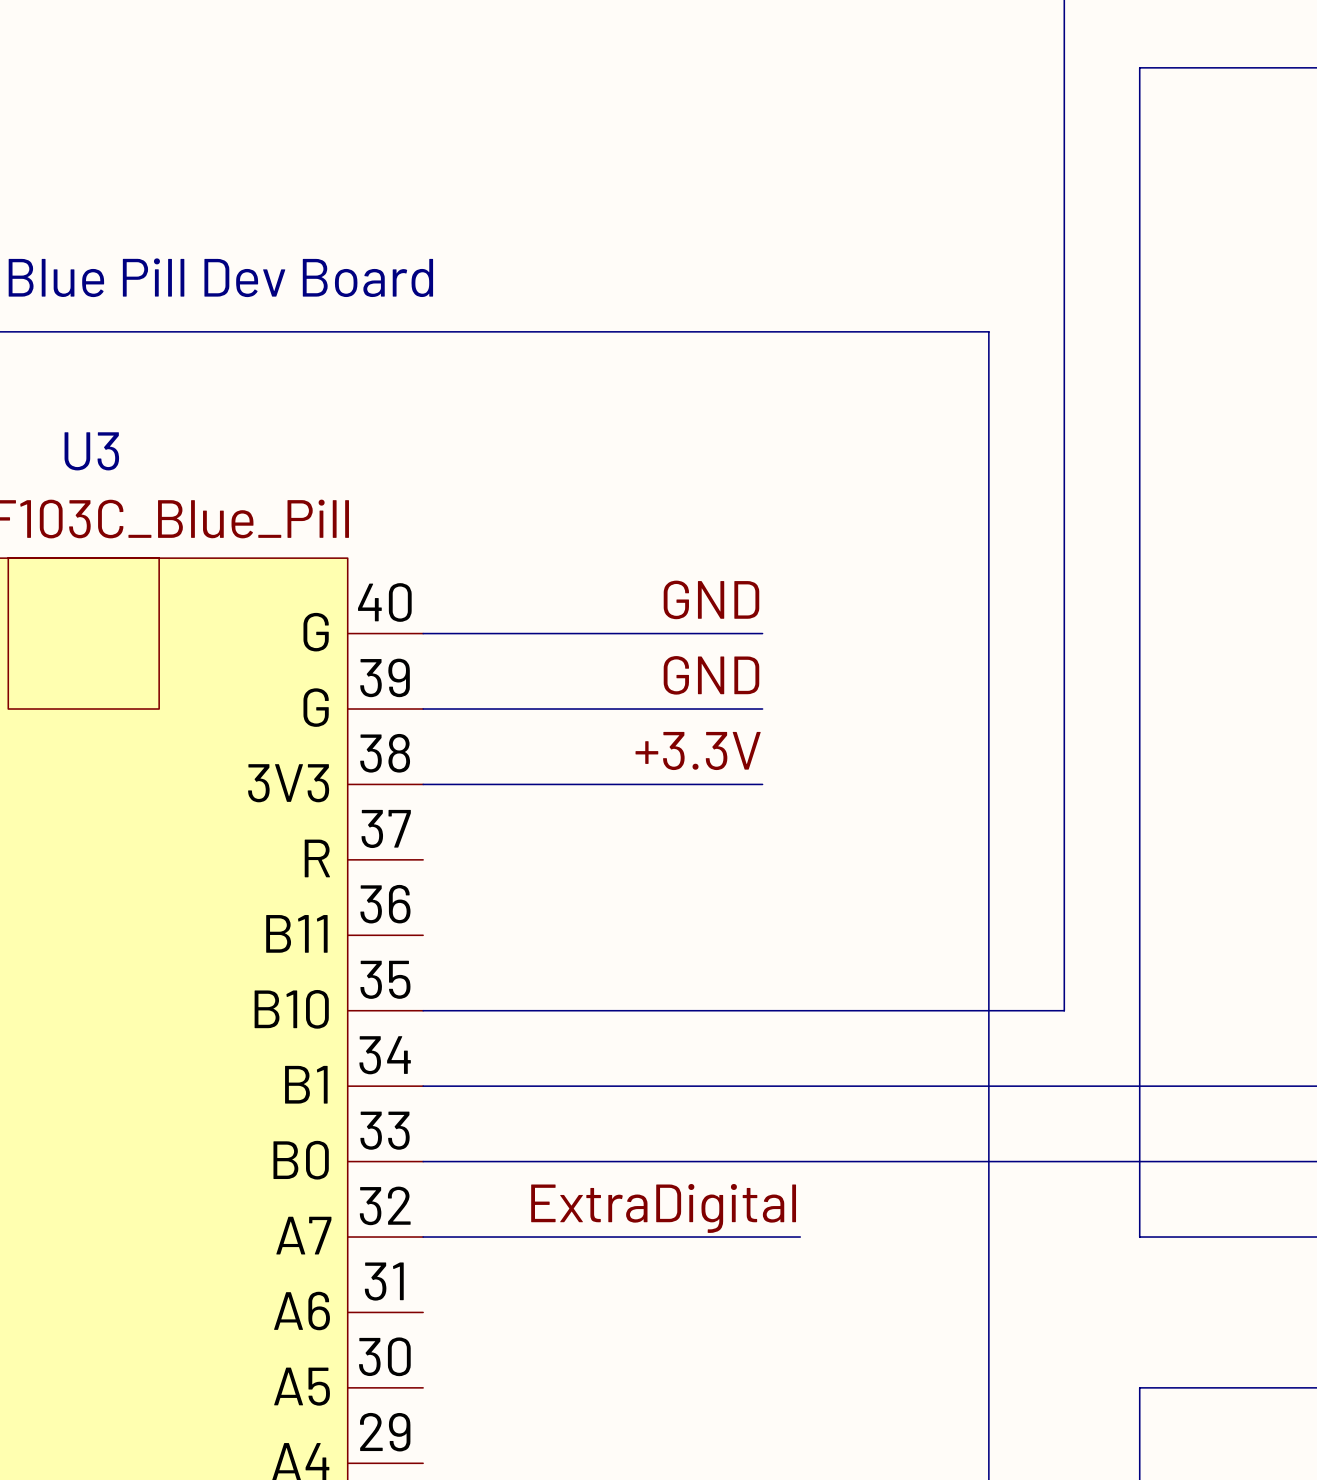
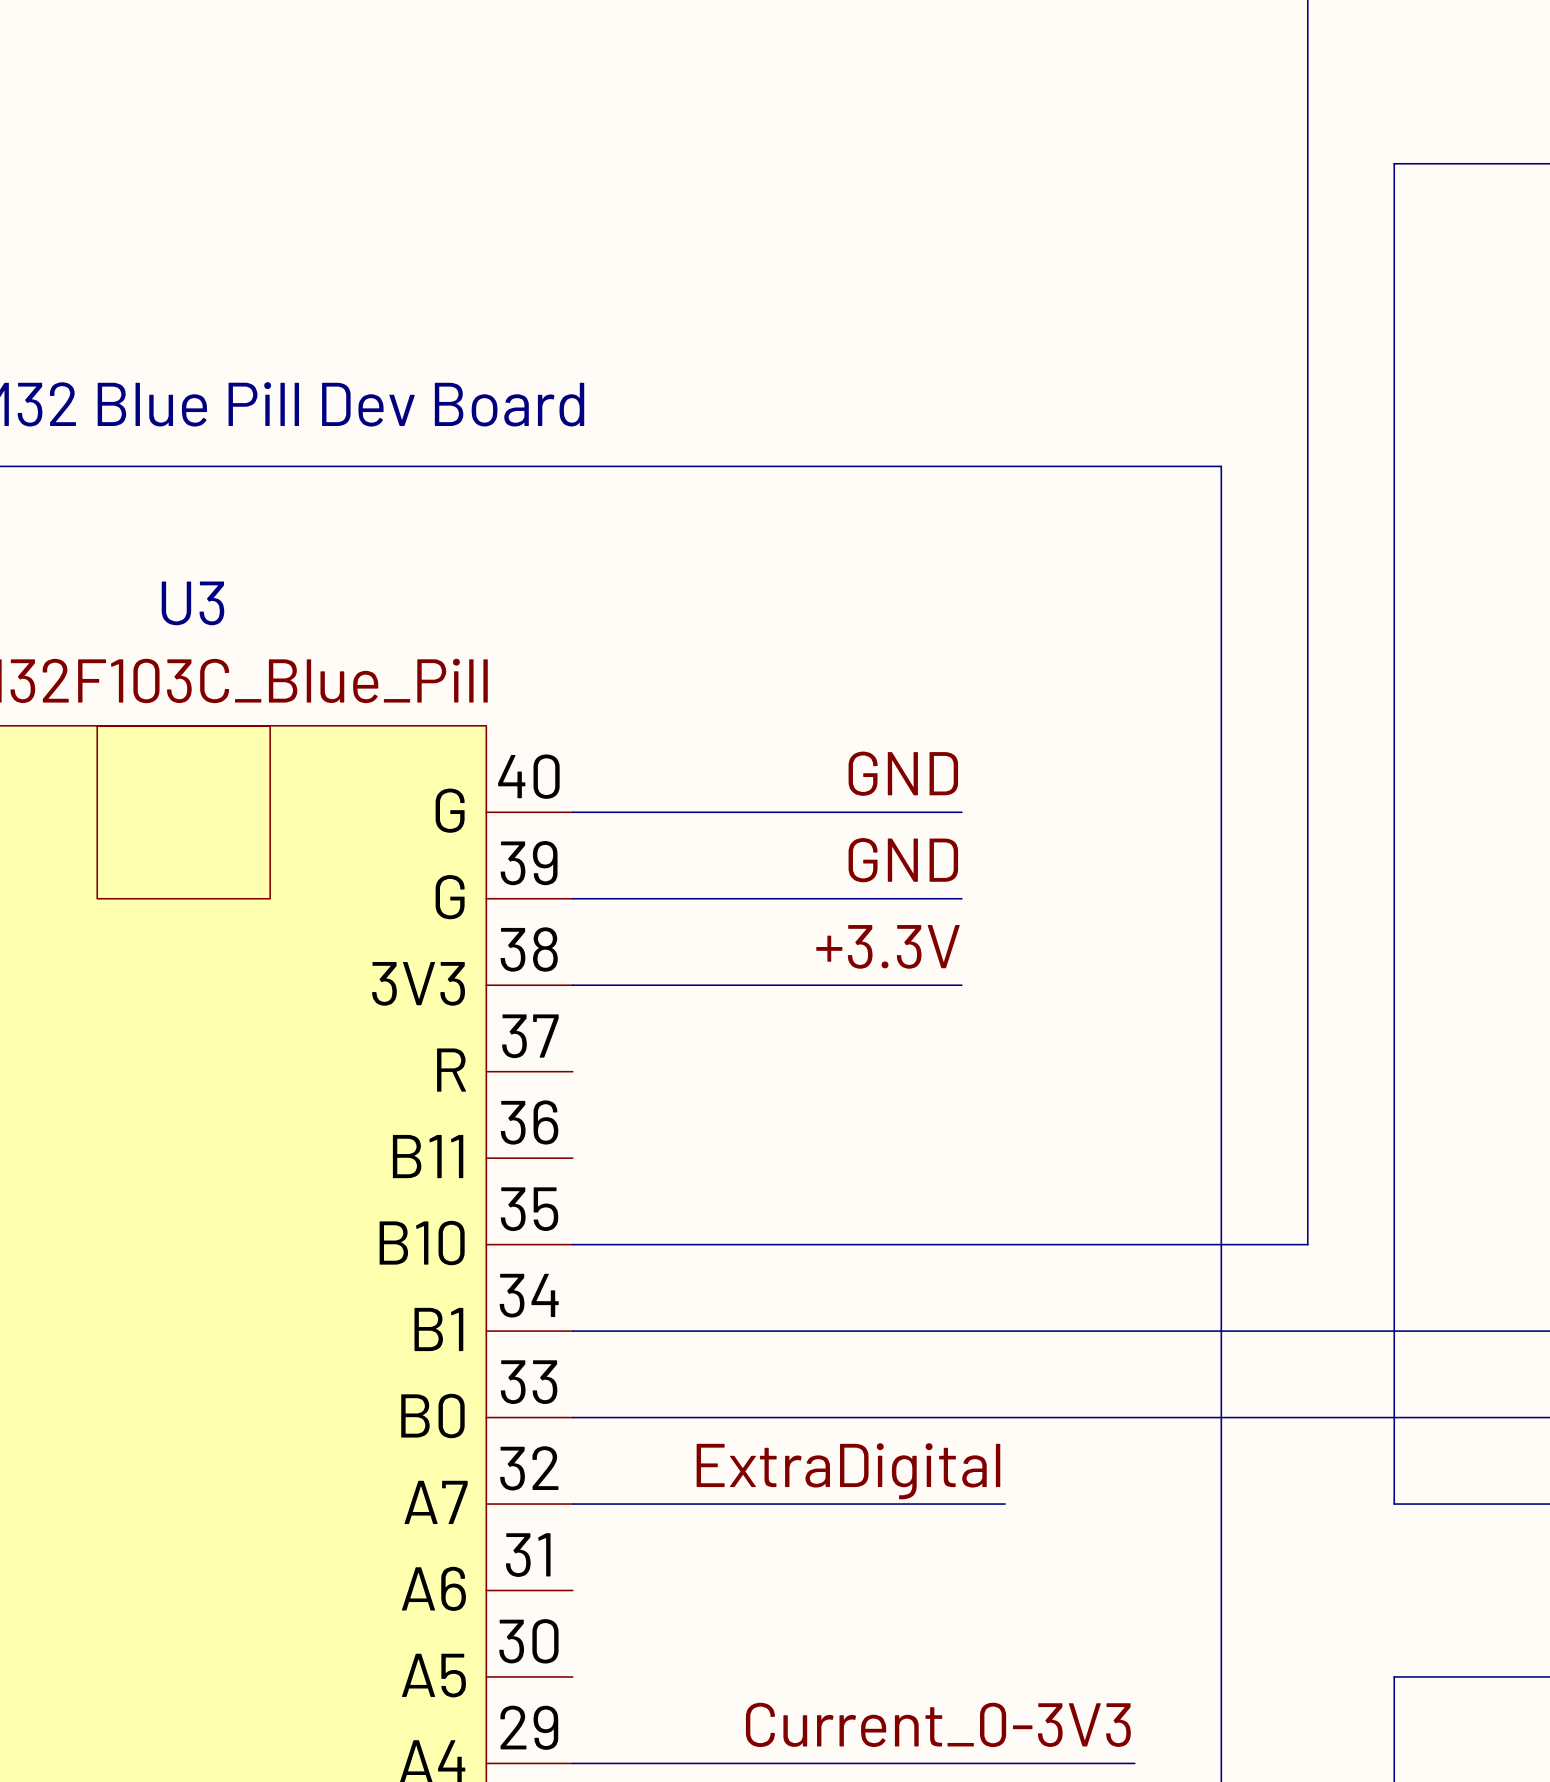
label: none -> Current_0-3V3 (938, 1724)
wire: none -> (572, 1763) (1134, 1763)

